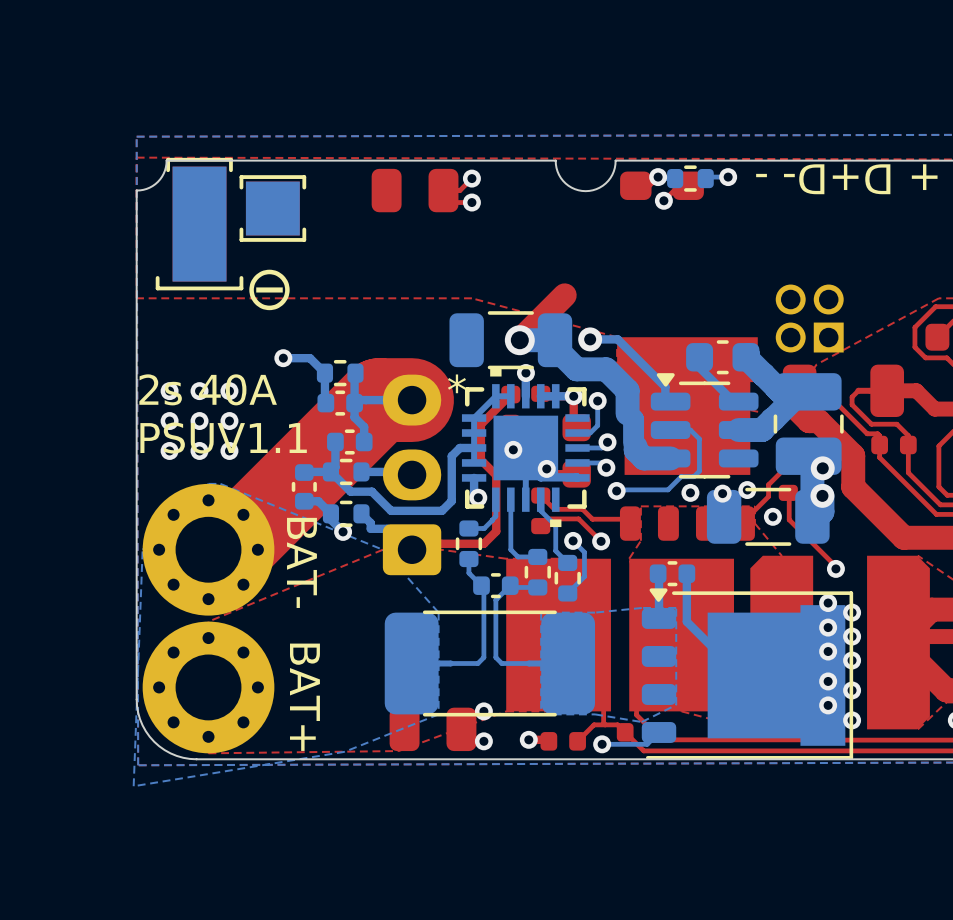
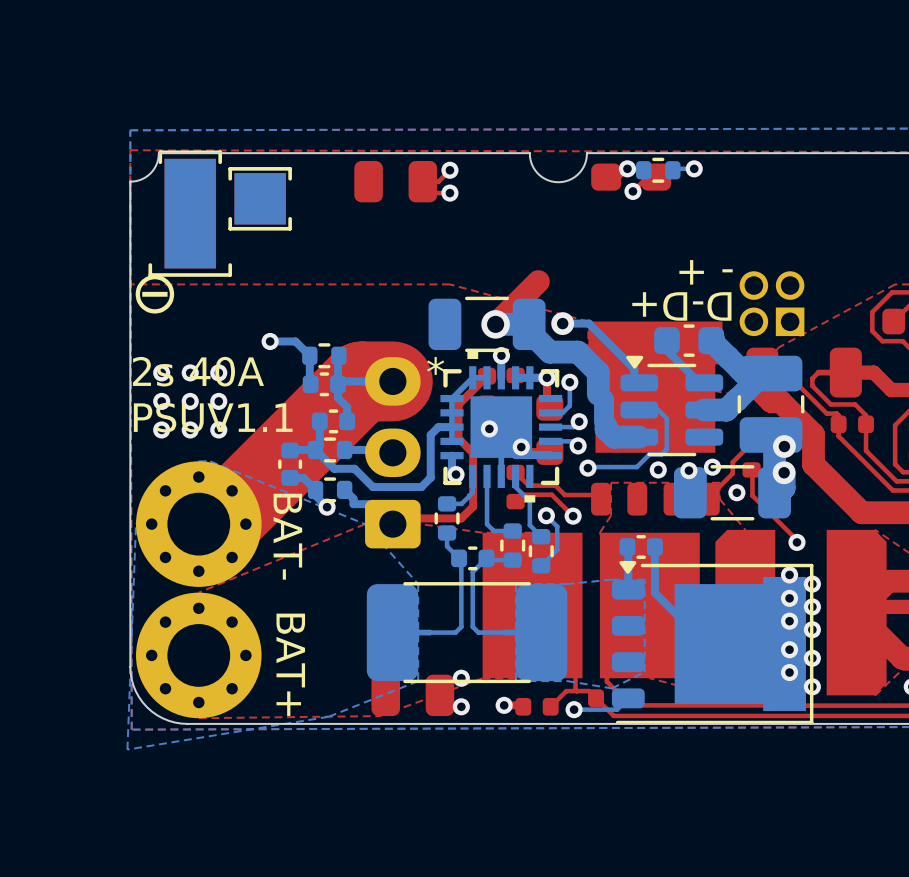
text: + D+D- - (846, 179) -> none
text: none -> - + (706, 272)
text position: ⊖ (269, 289) -> ⊖ (154, 294)
text: none -> D-D+ (681, 306)

